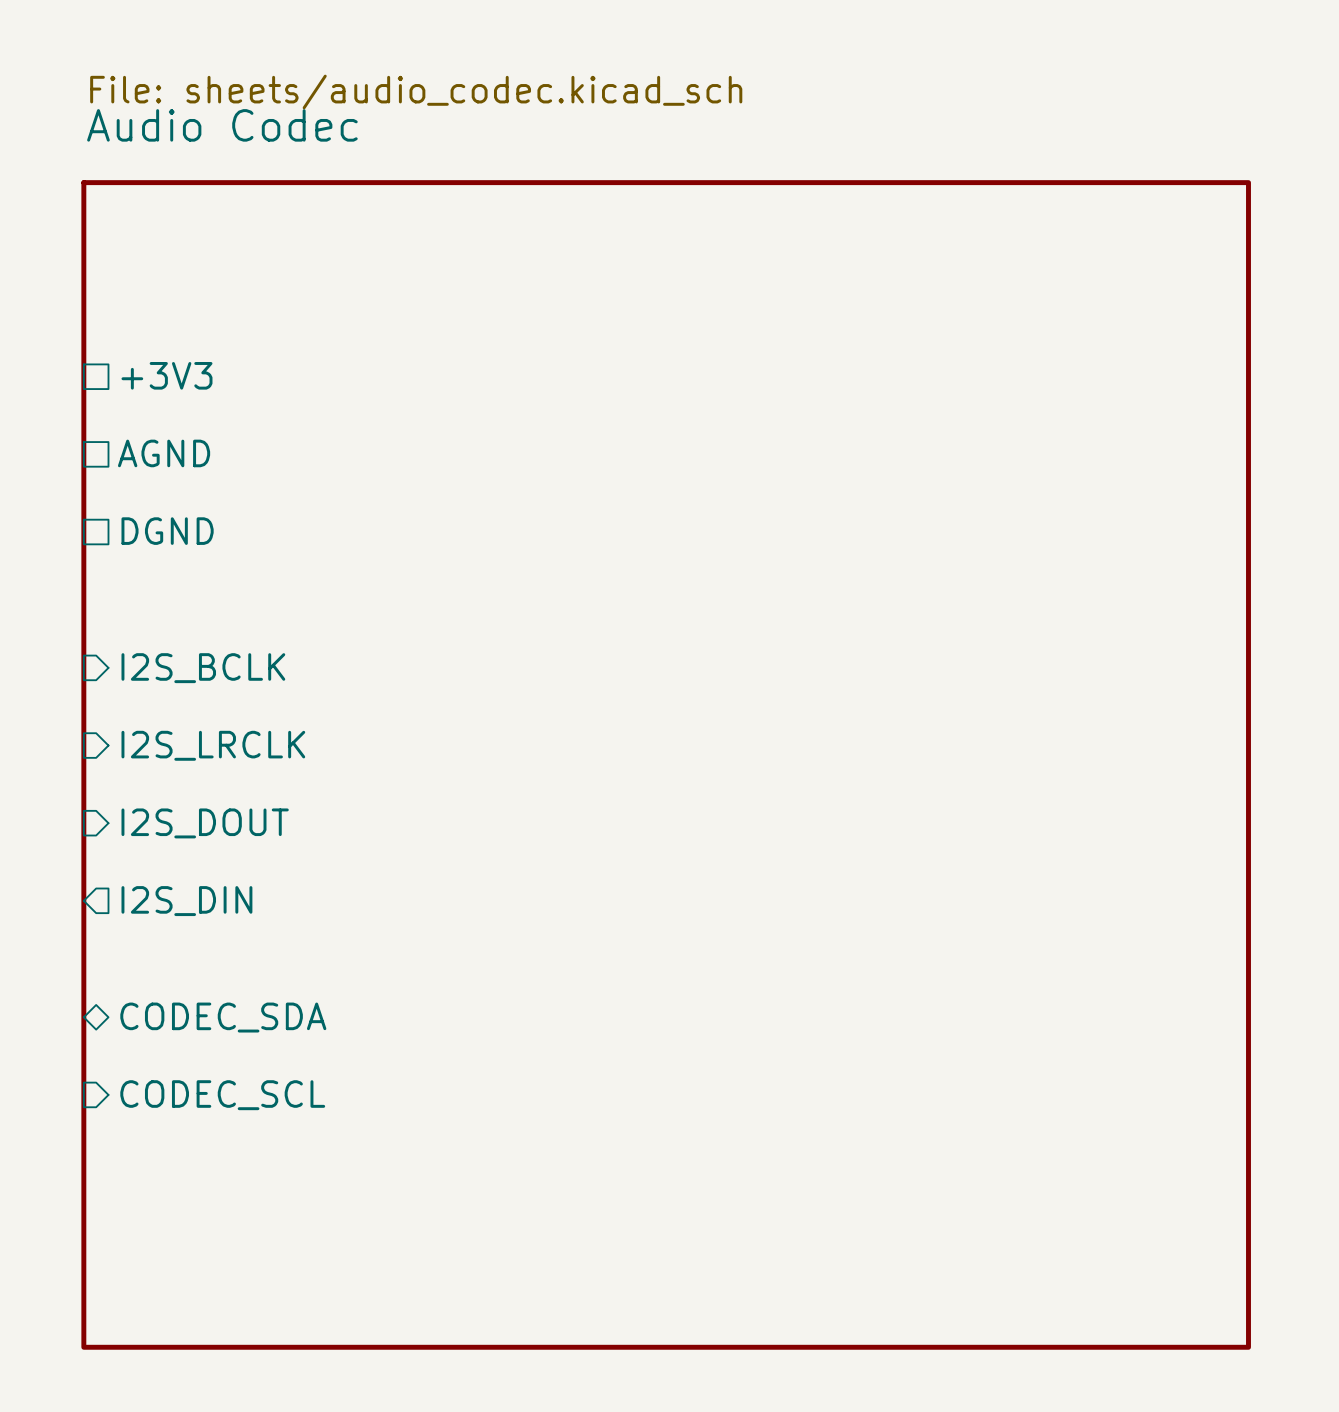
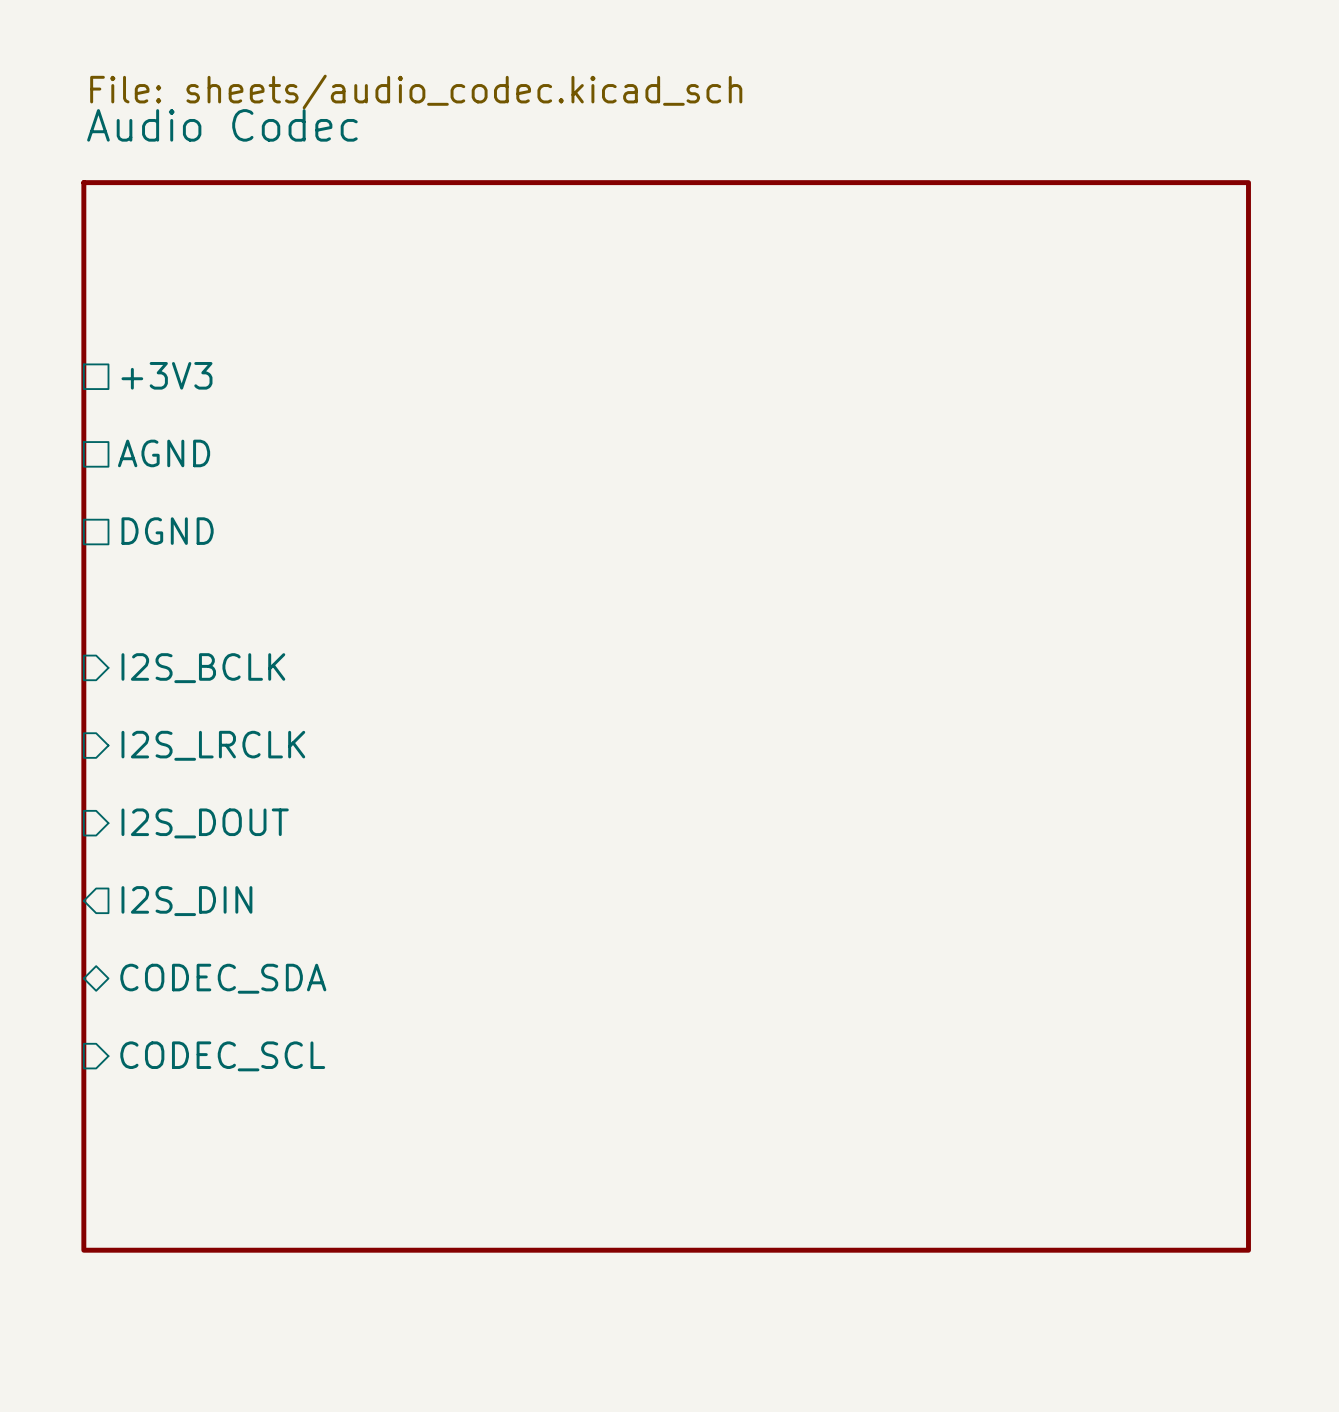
sheet Audio Codec: none -> File: sheets/audio_codec.kicad_sch (666, 716)
sheet Audio Codec: File: sheets/audio_codec.kicad_sch (666, 764) -> none
sheet pin position: CODEC_SDA (223, 1017) -> CODEC_SDA (223, 978)
sheet pin position: CODEC_SCL (222, 1095) -> CODEC_SCL (222, 1056)

